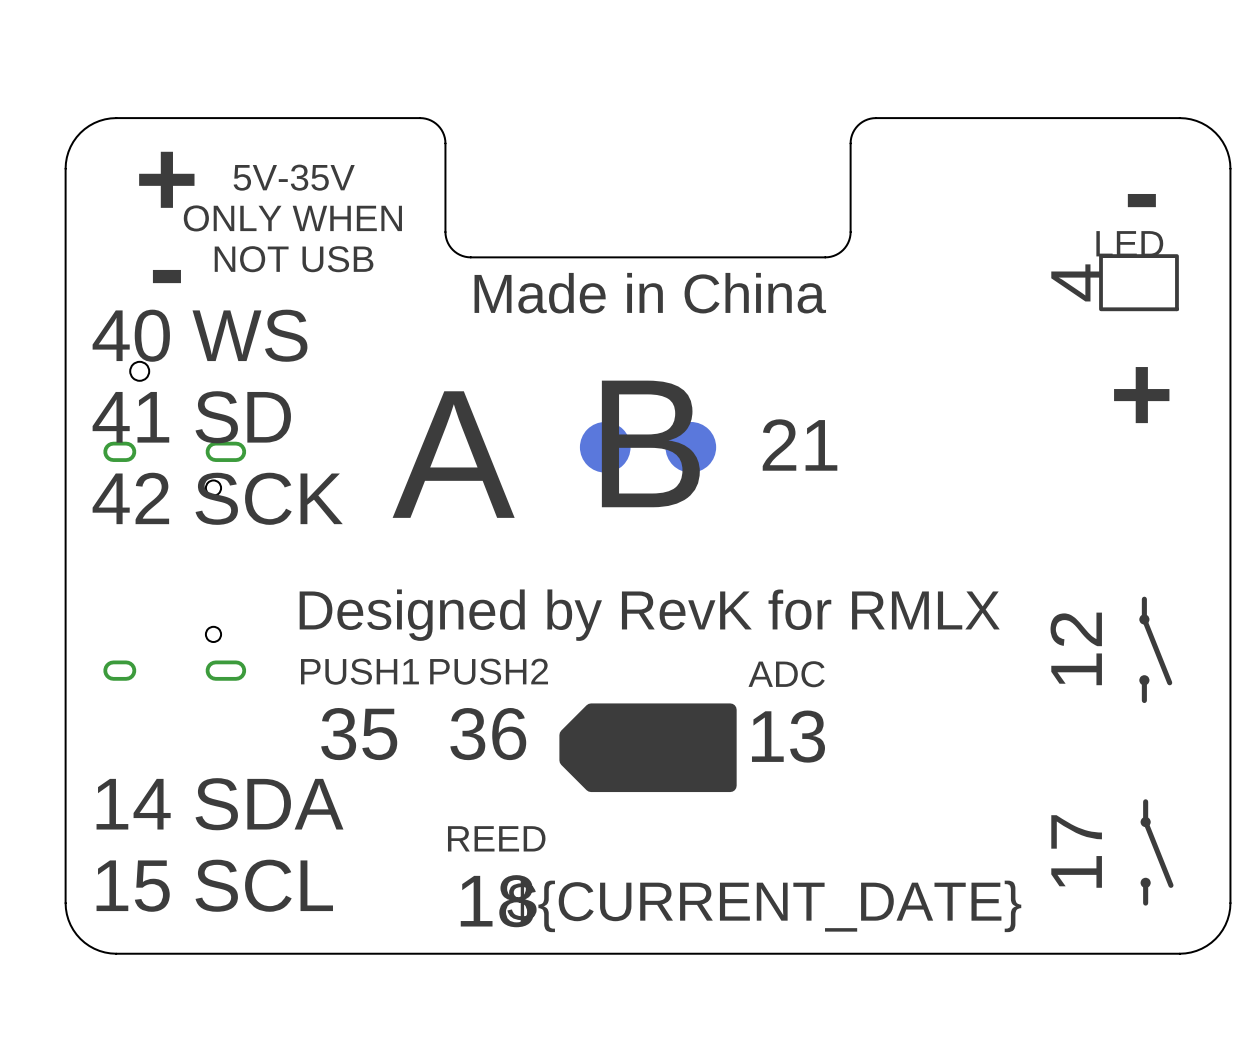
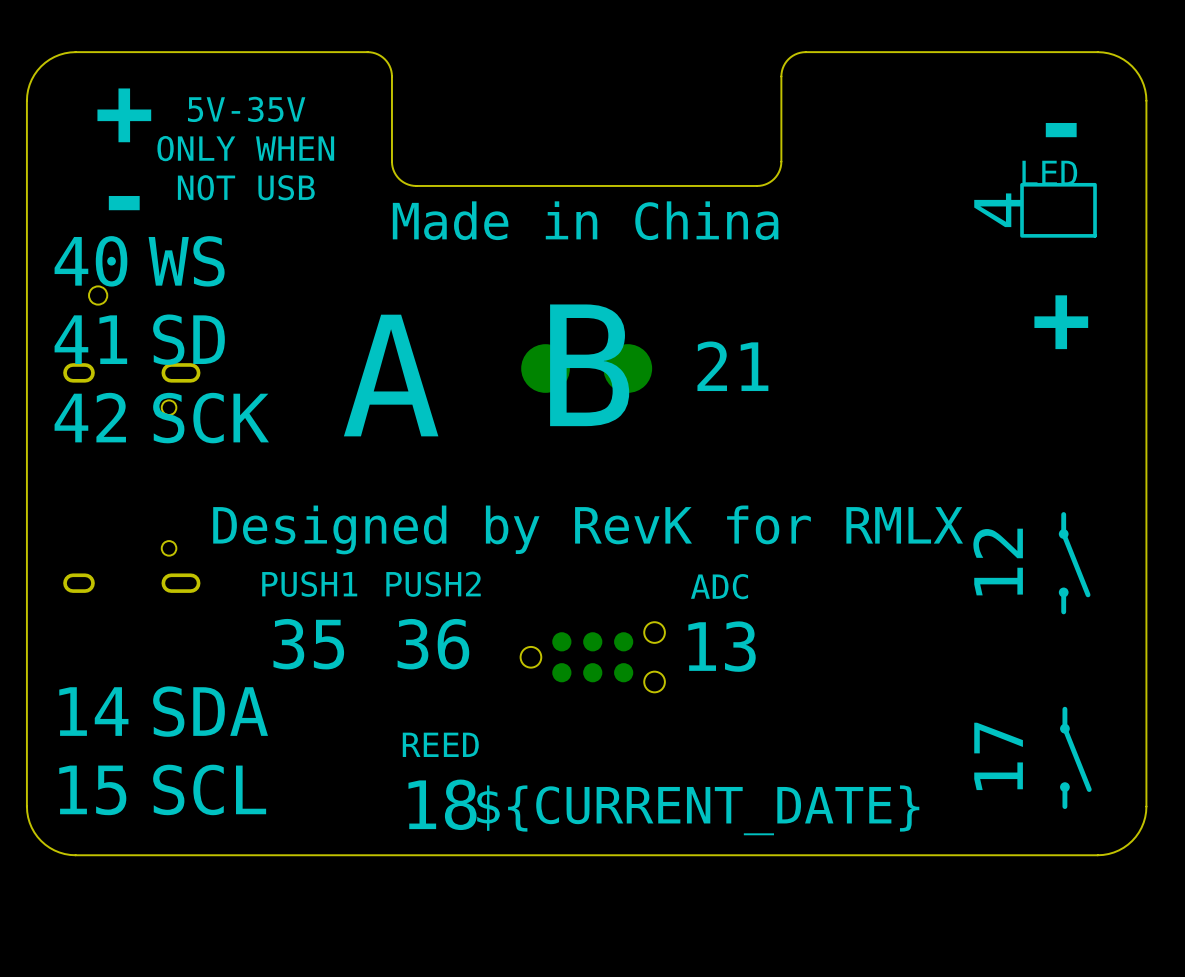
part footprint: [559, 703, 737, 793] -> [520, 622, 665, 693]

